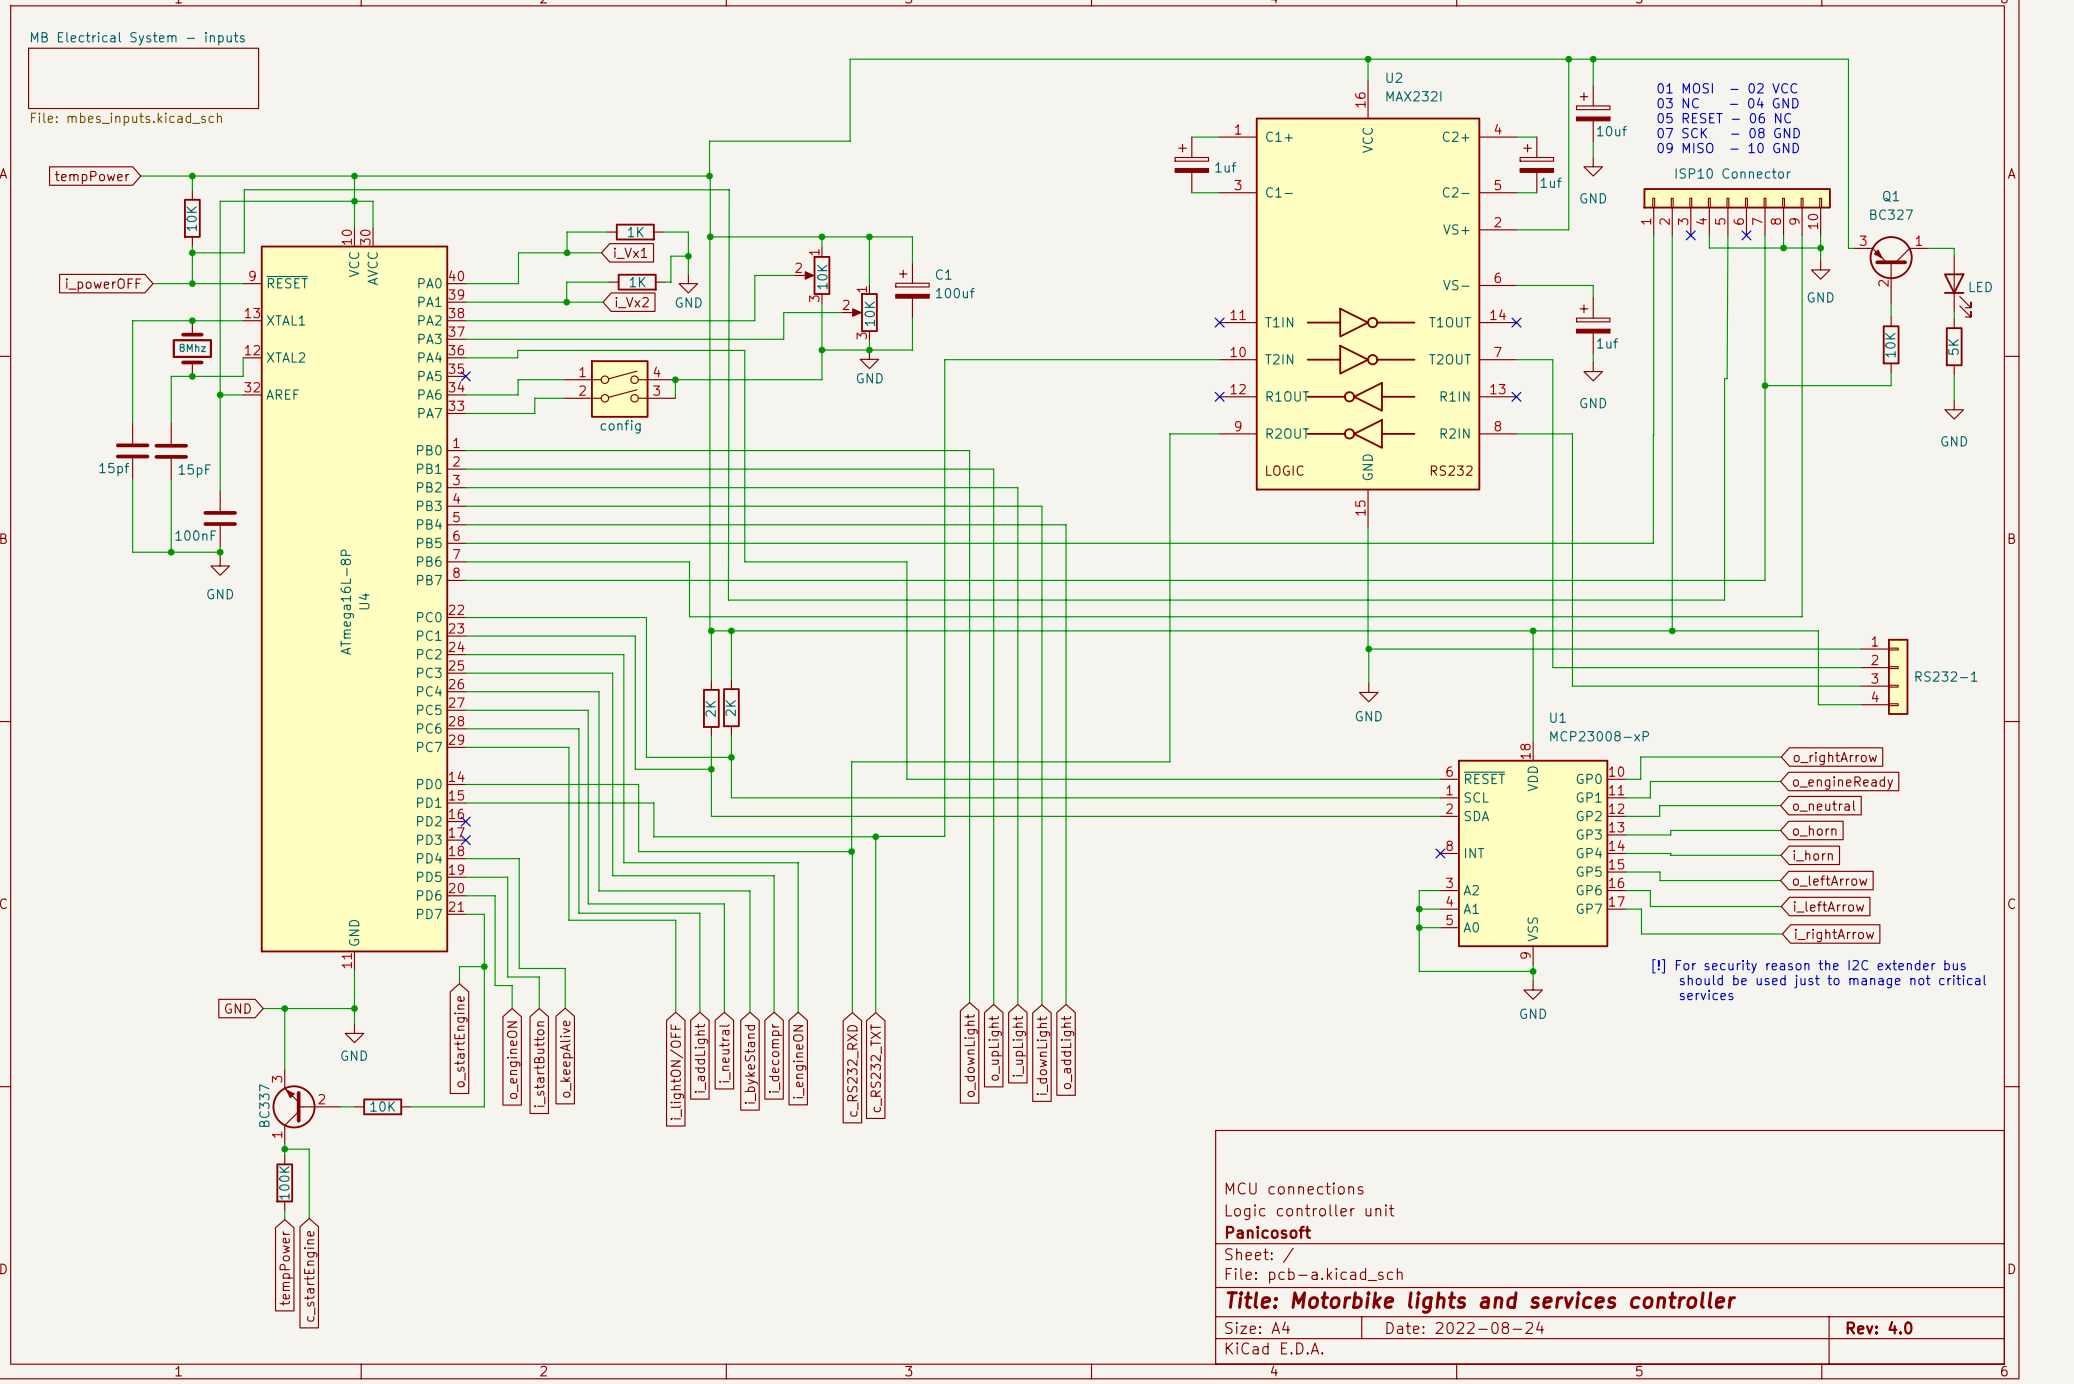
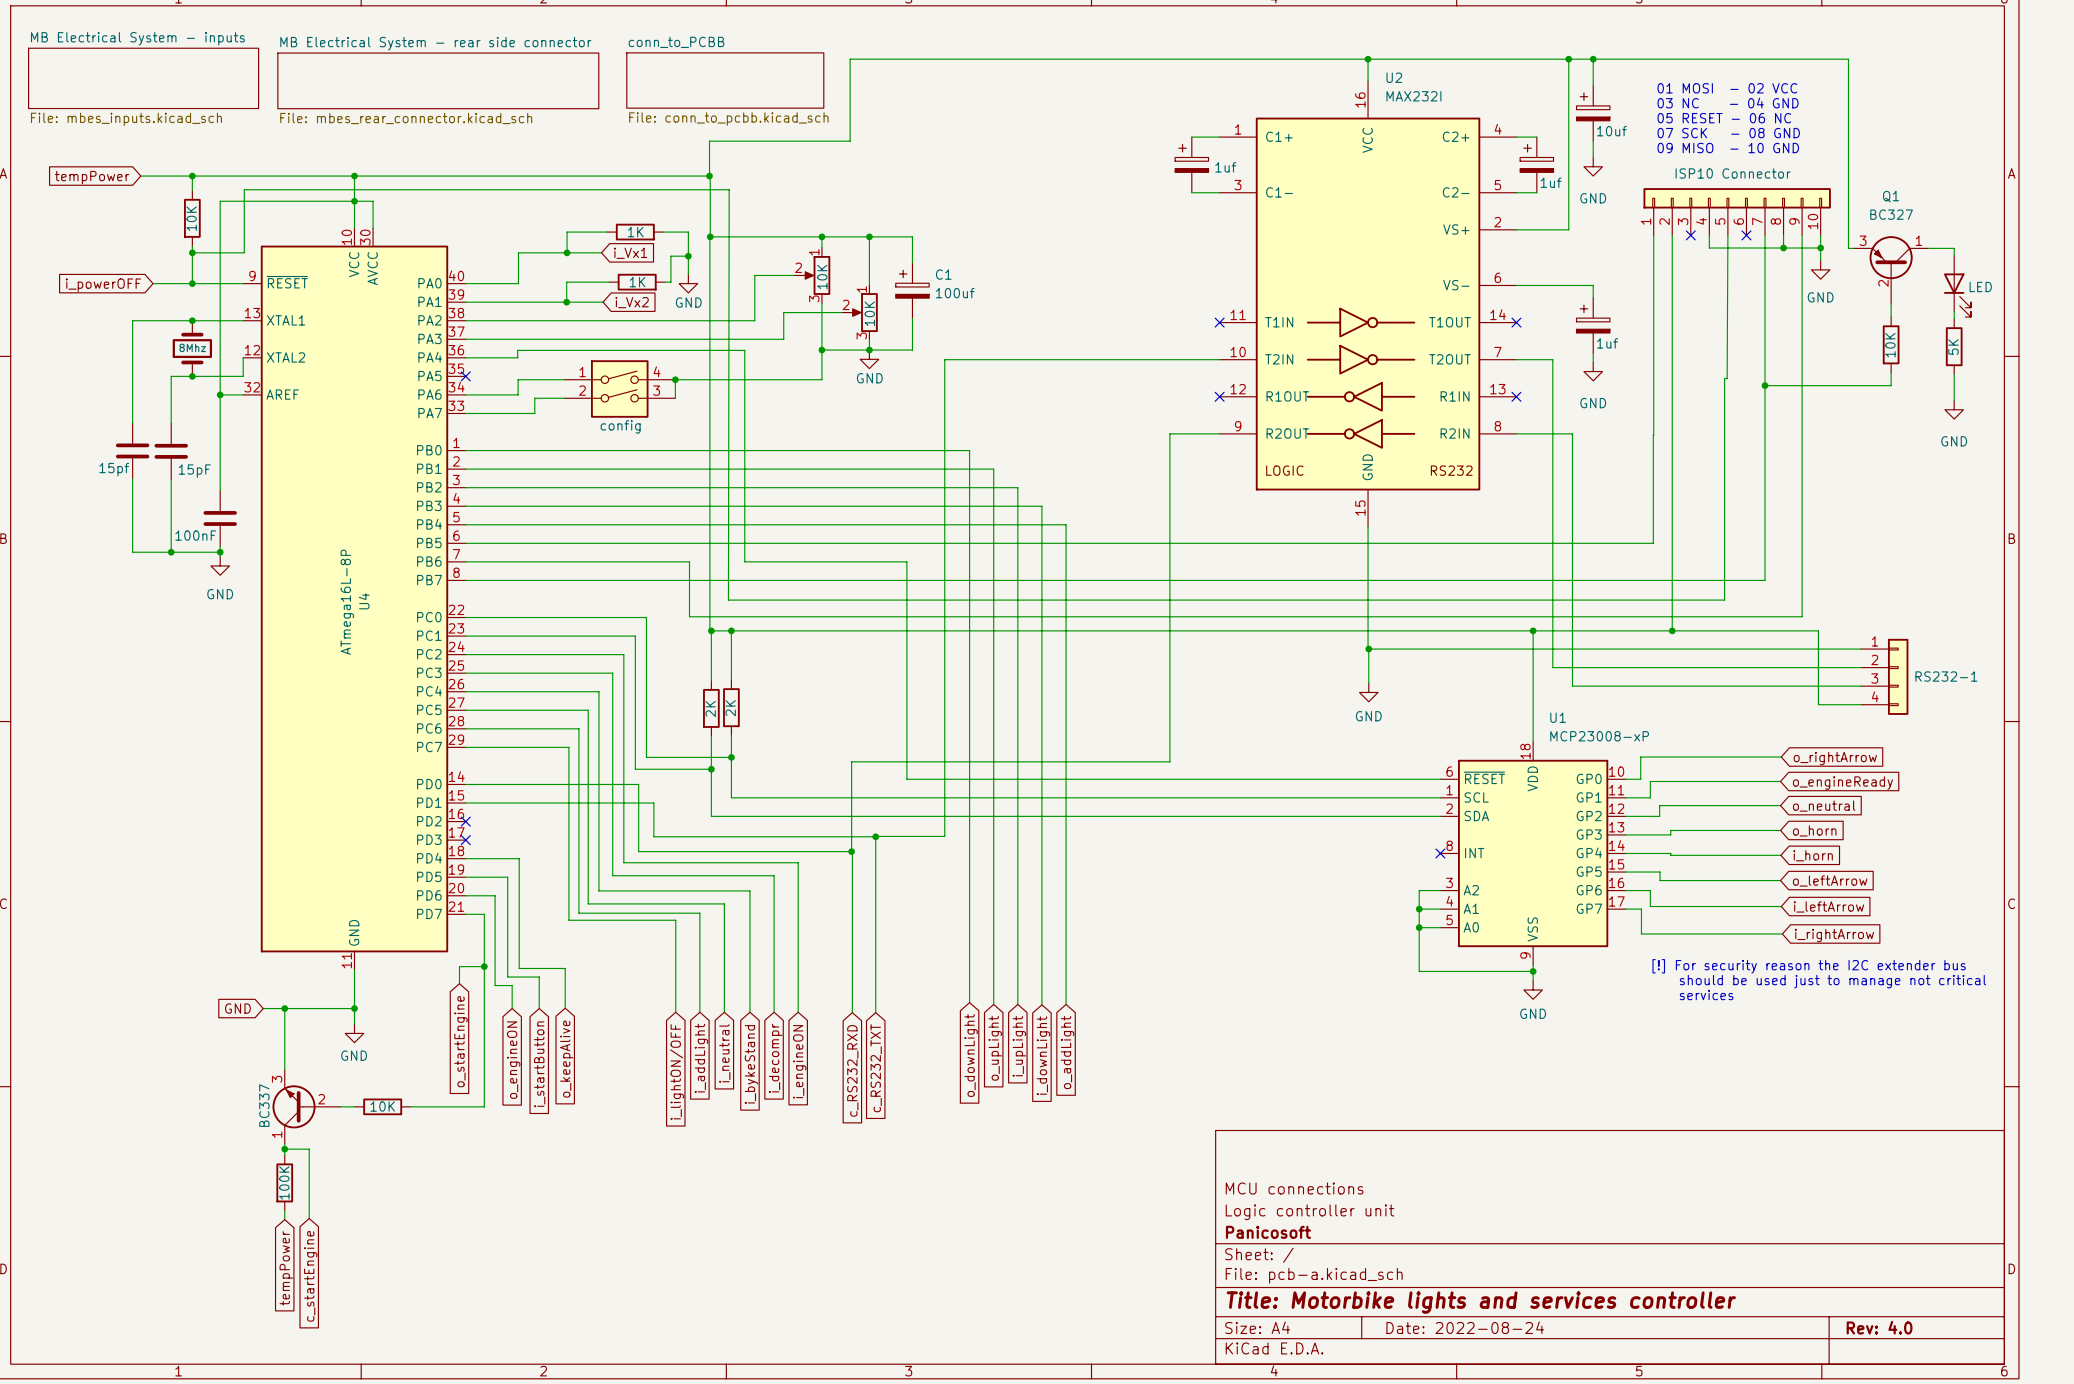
sheet MB Electrical System - rear side connector: none -> File: mbes_rear_connector.kicad_sch (438, 80)
sheet conn_to_PCBB: none -> File: conn_to_pcbb.kicad_sch (725, 80)

